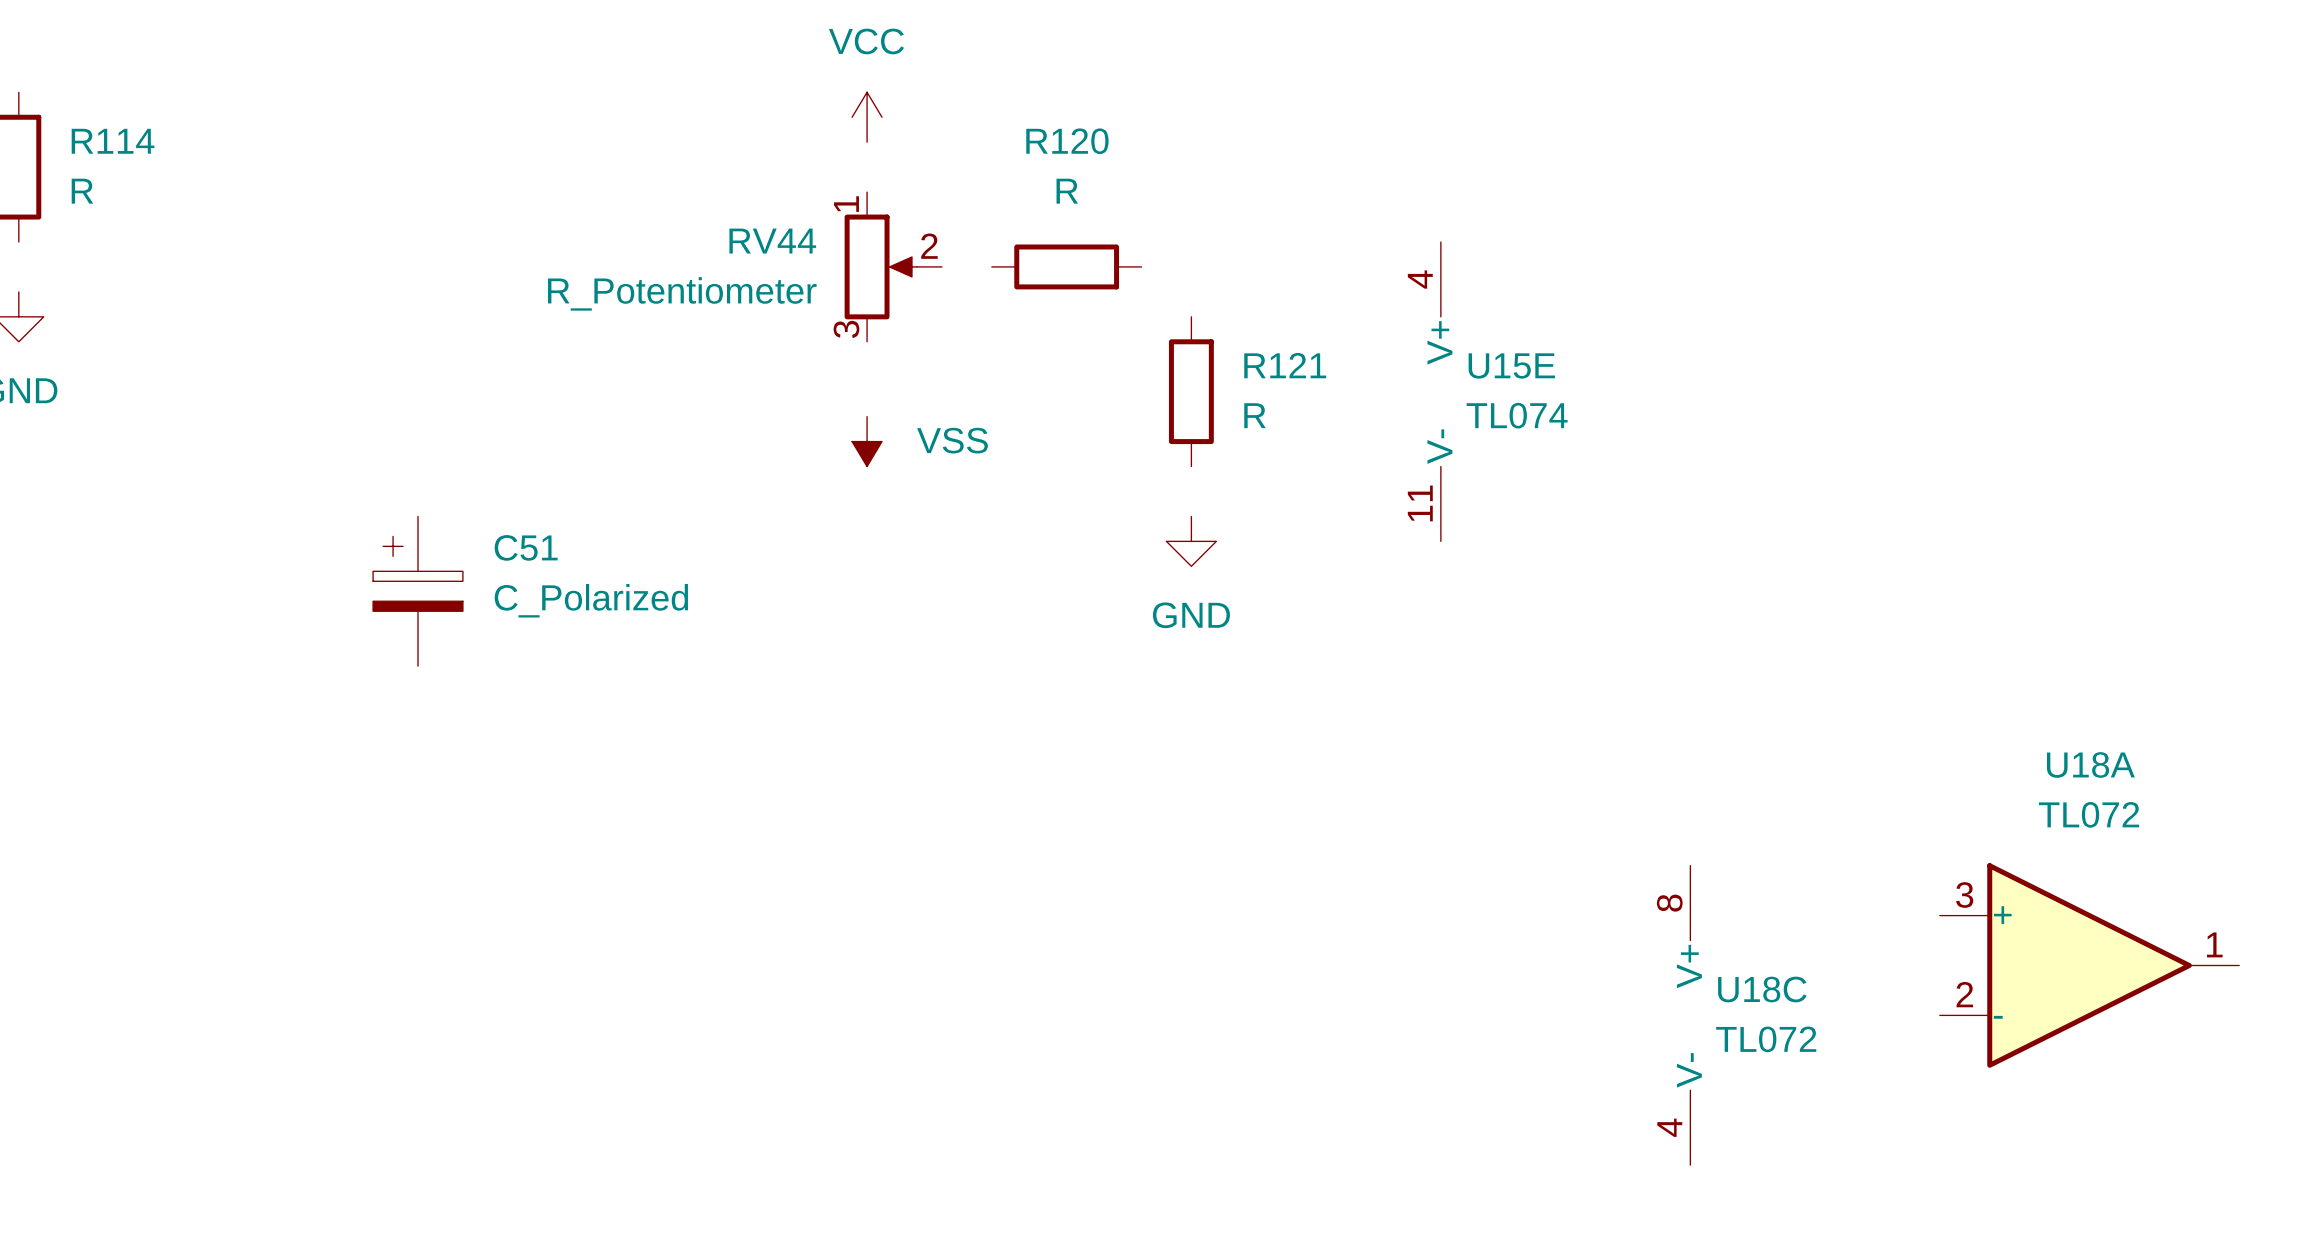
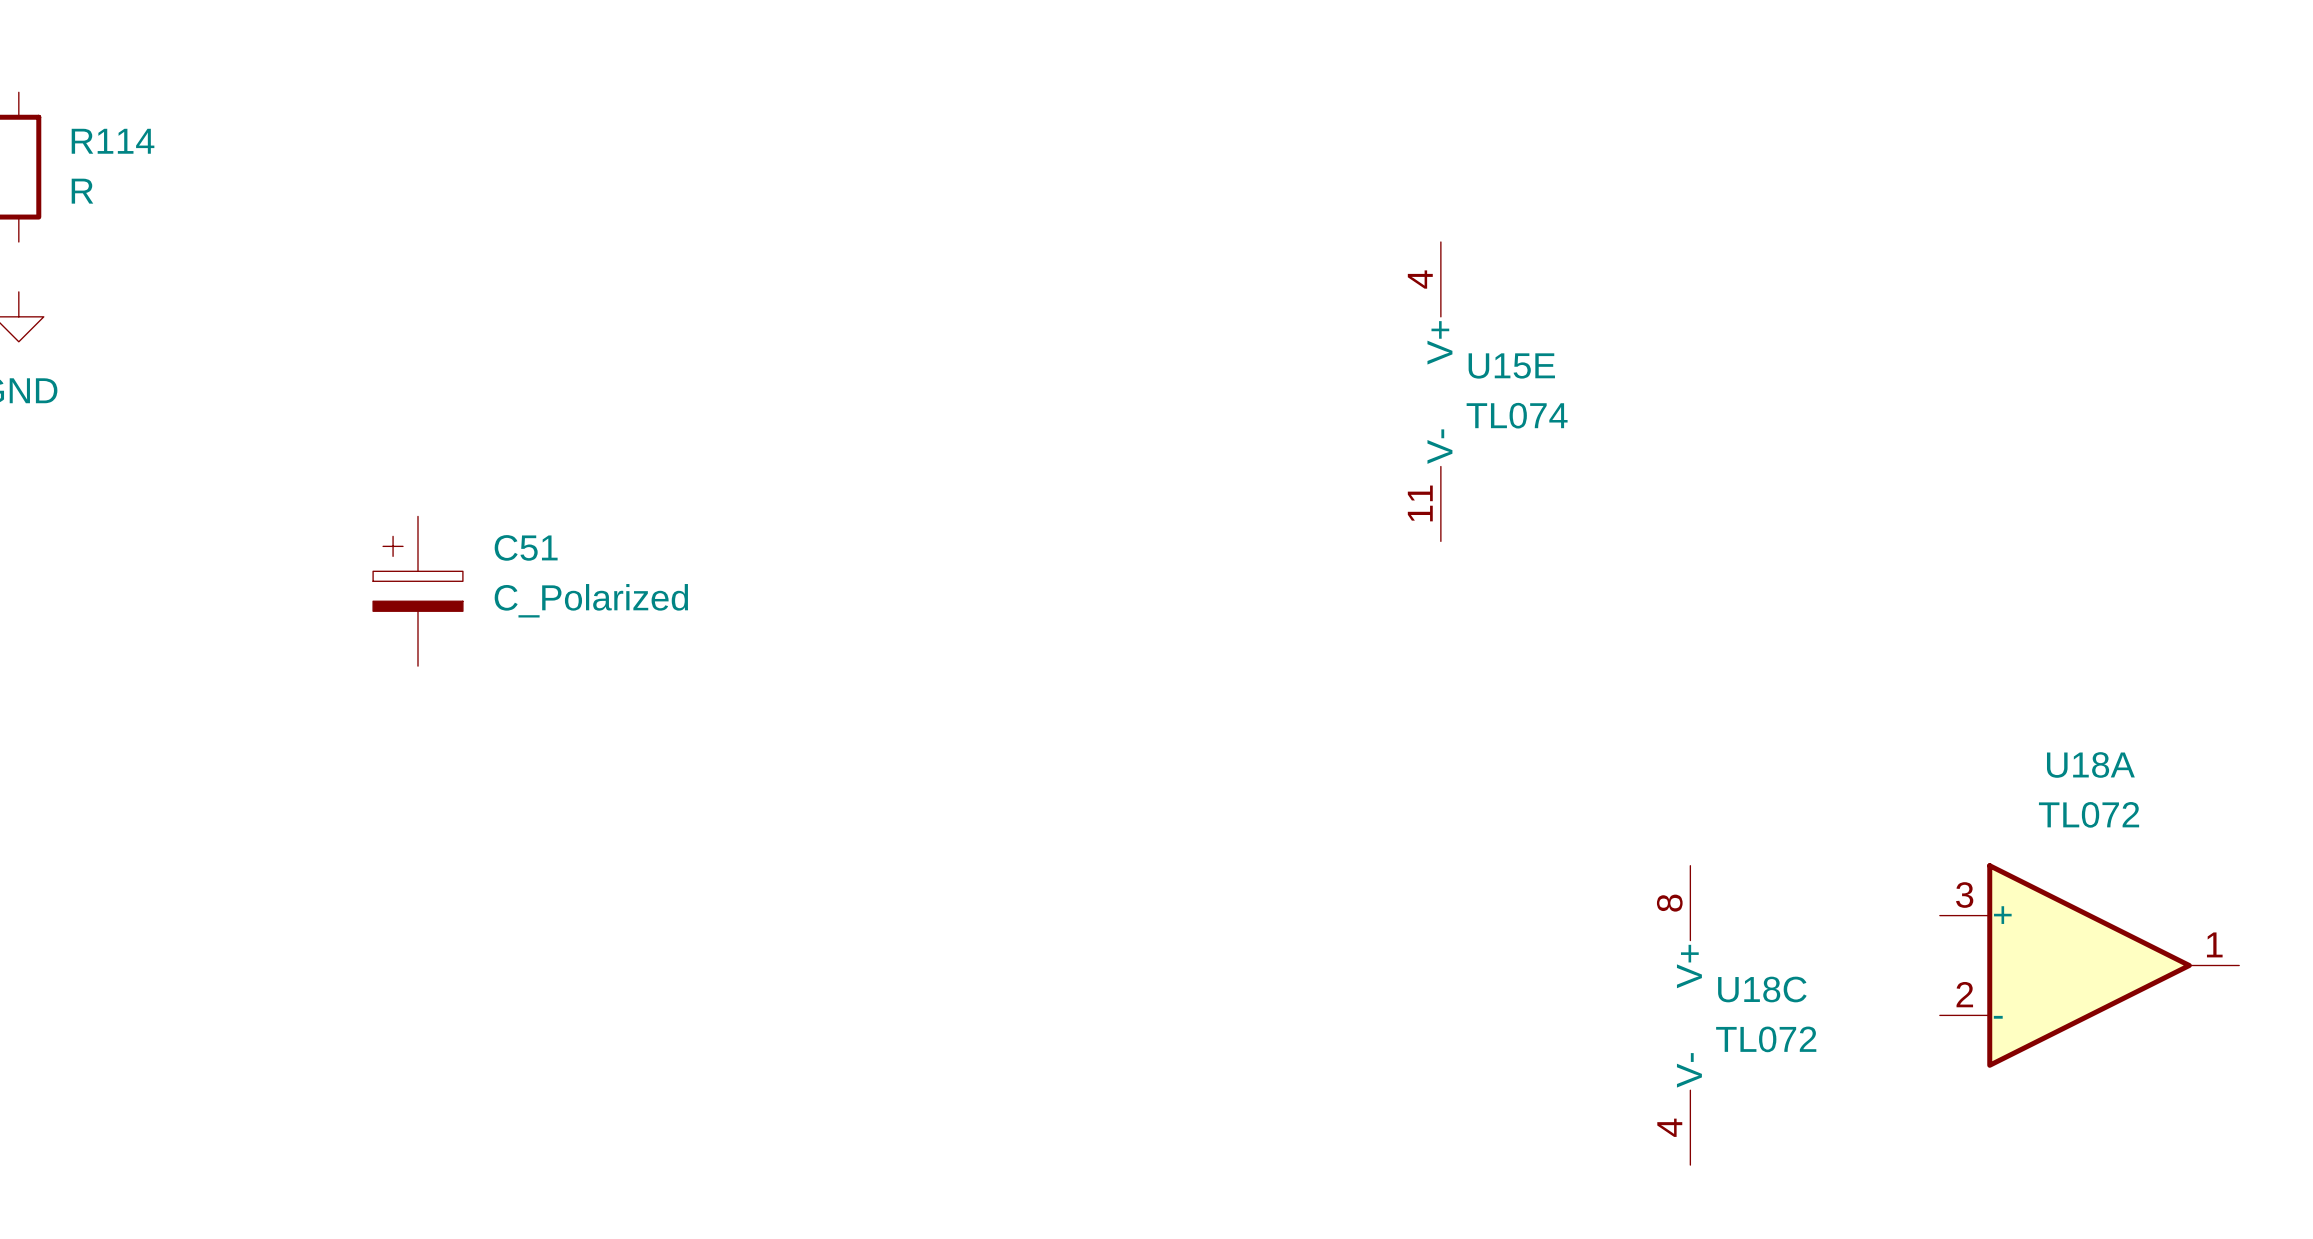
power symbol: VCC (867, 117) -> none
RV44: R_Potentiometer (893, 266) -> none
R120: R (1066, 266) -> none
R121: R (1191, 391) -> none
power symbol: VSS (867, 441) -> none
power symbol: GND (1191, 541) -> none

